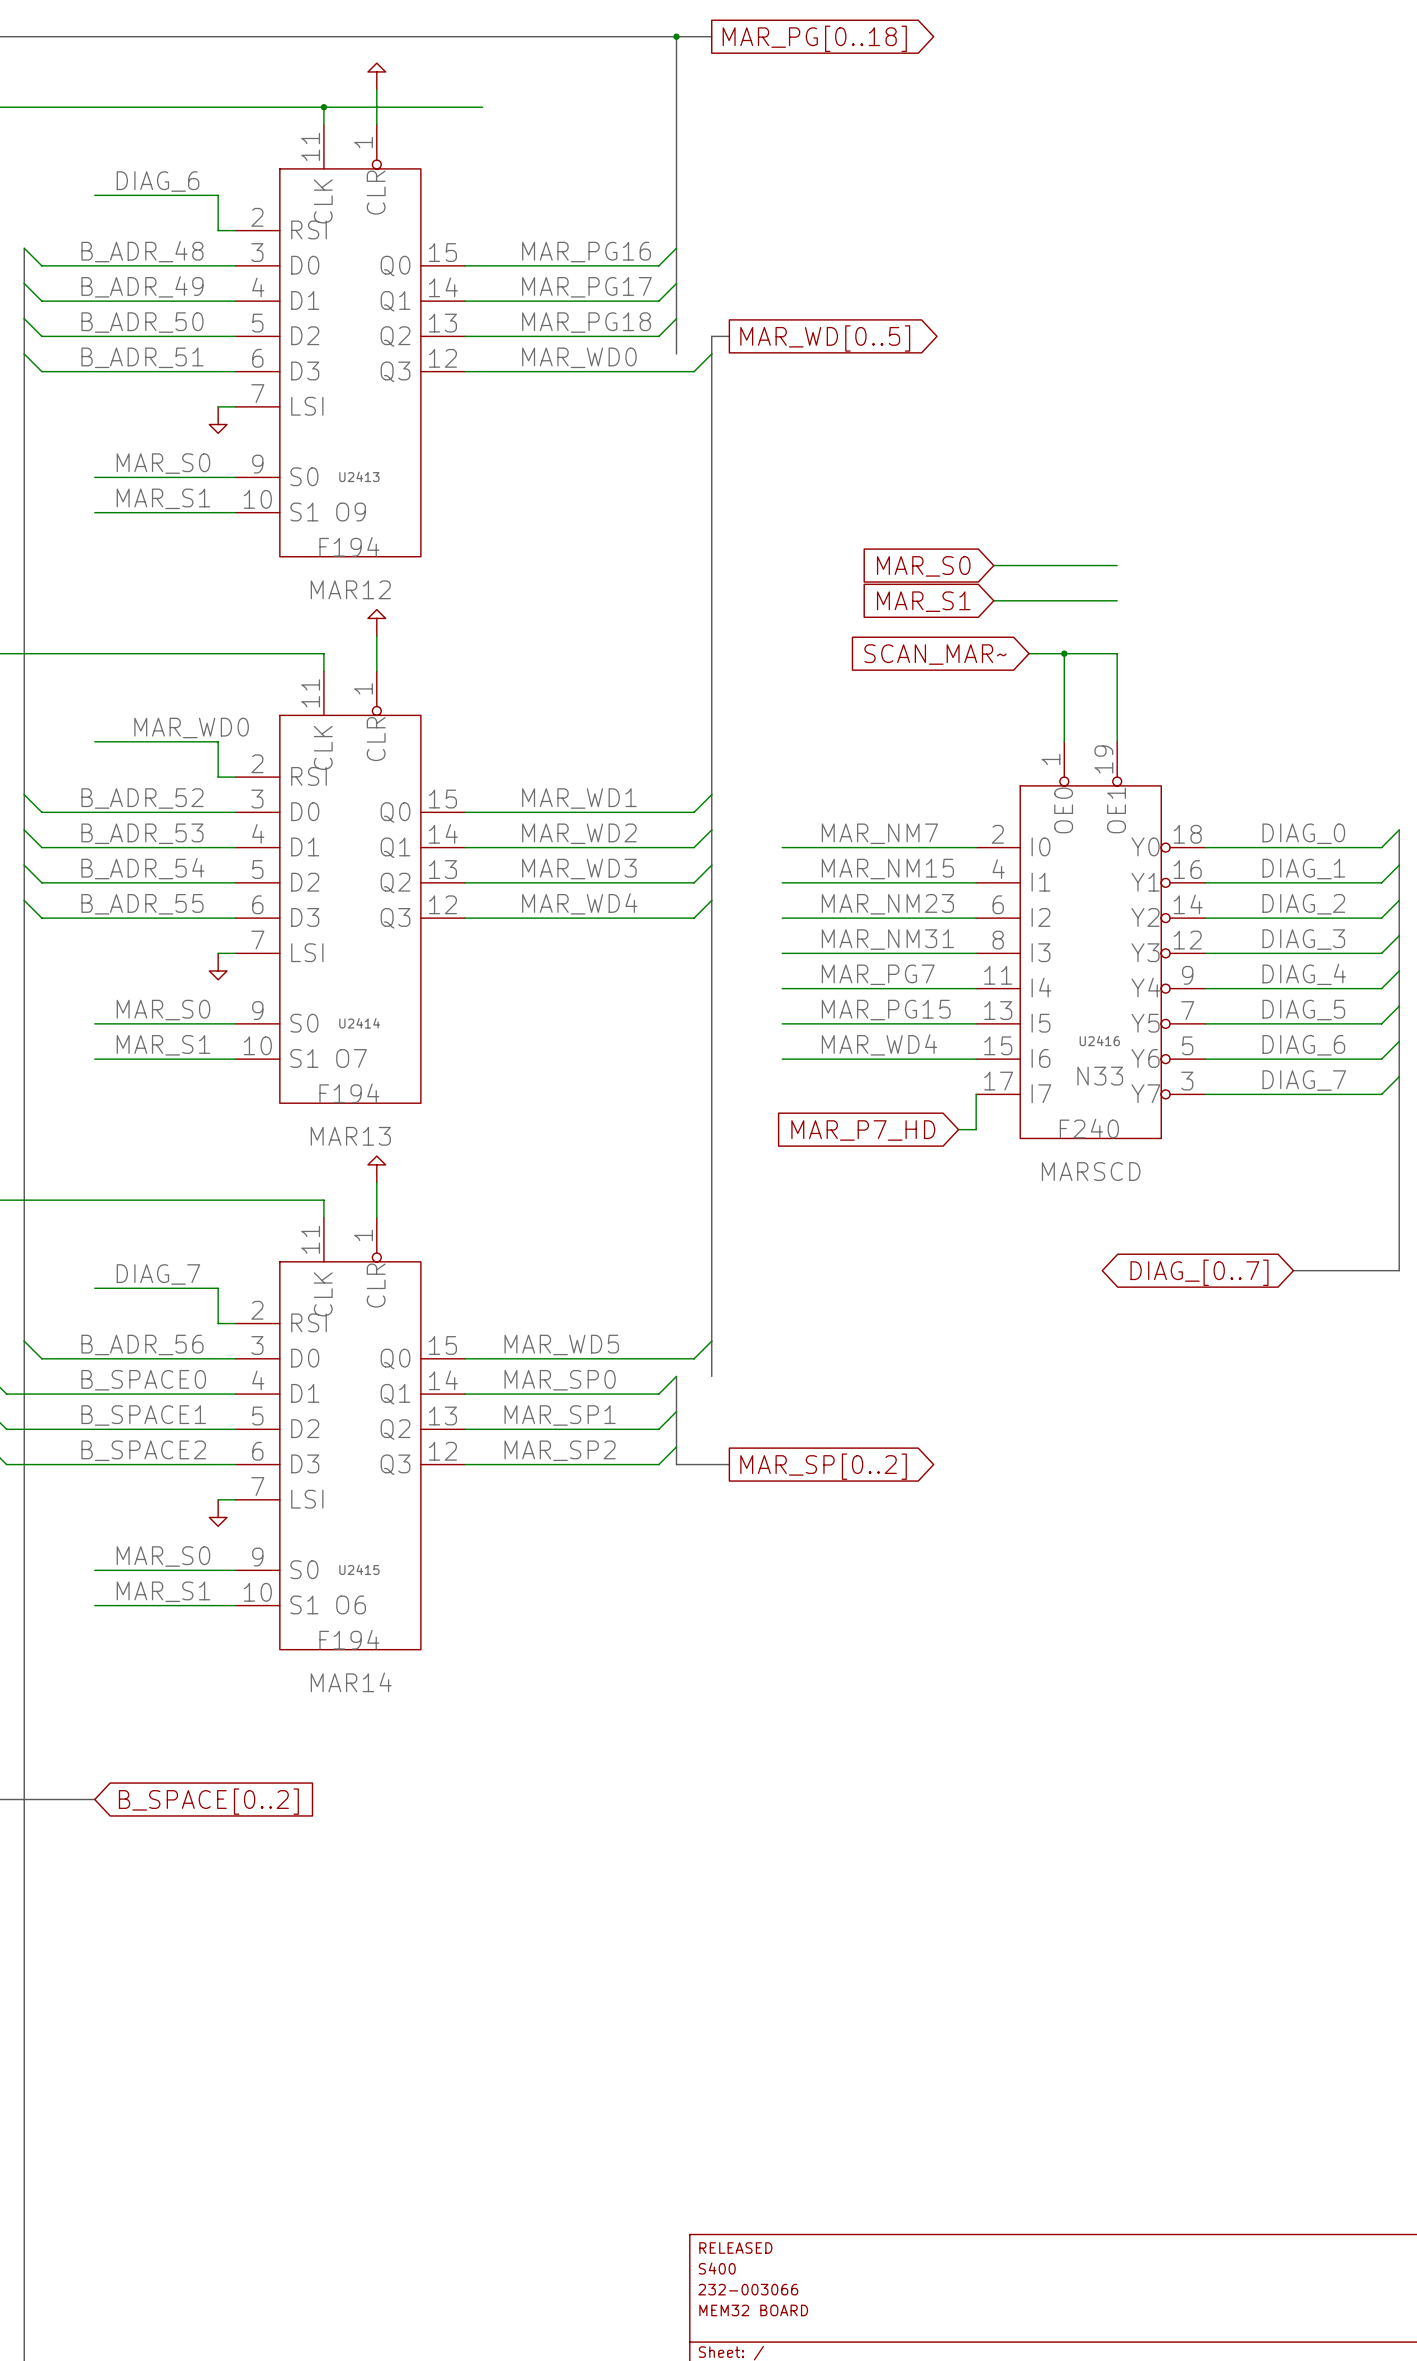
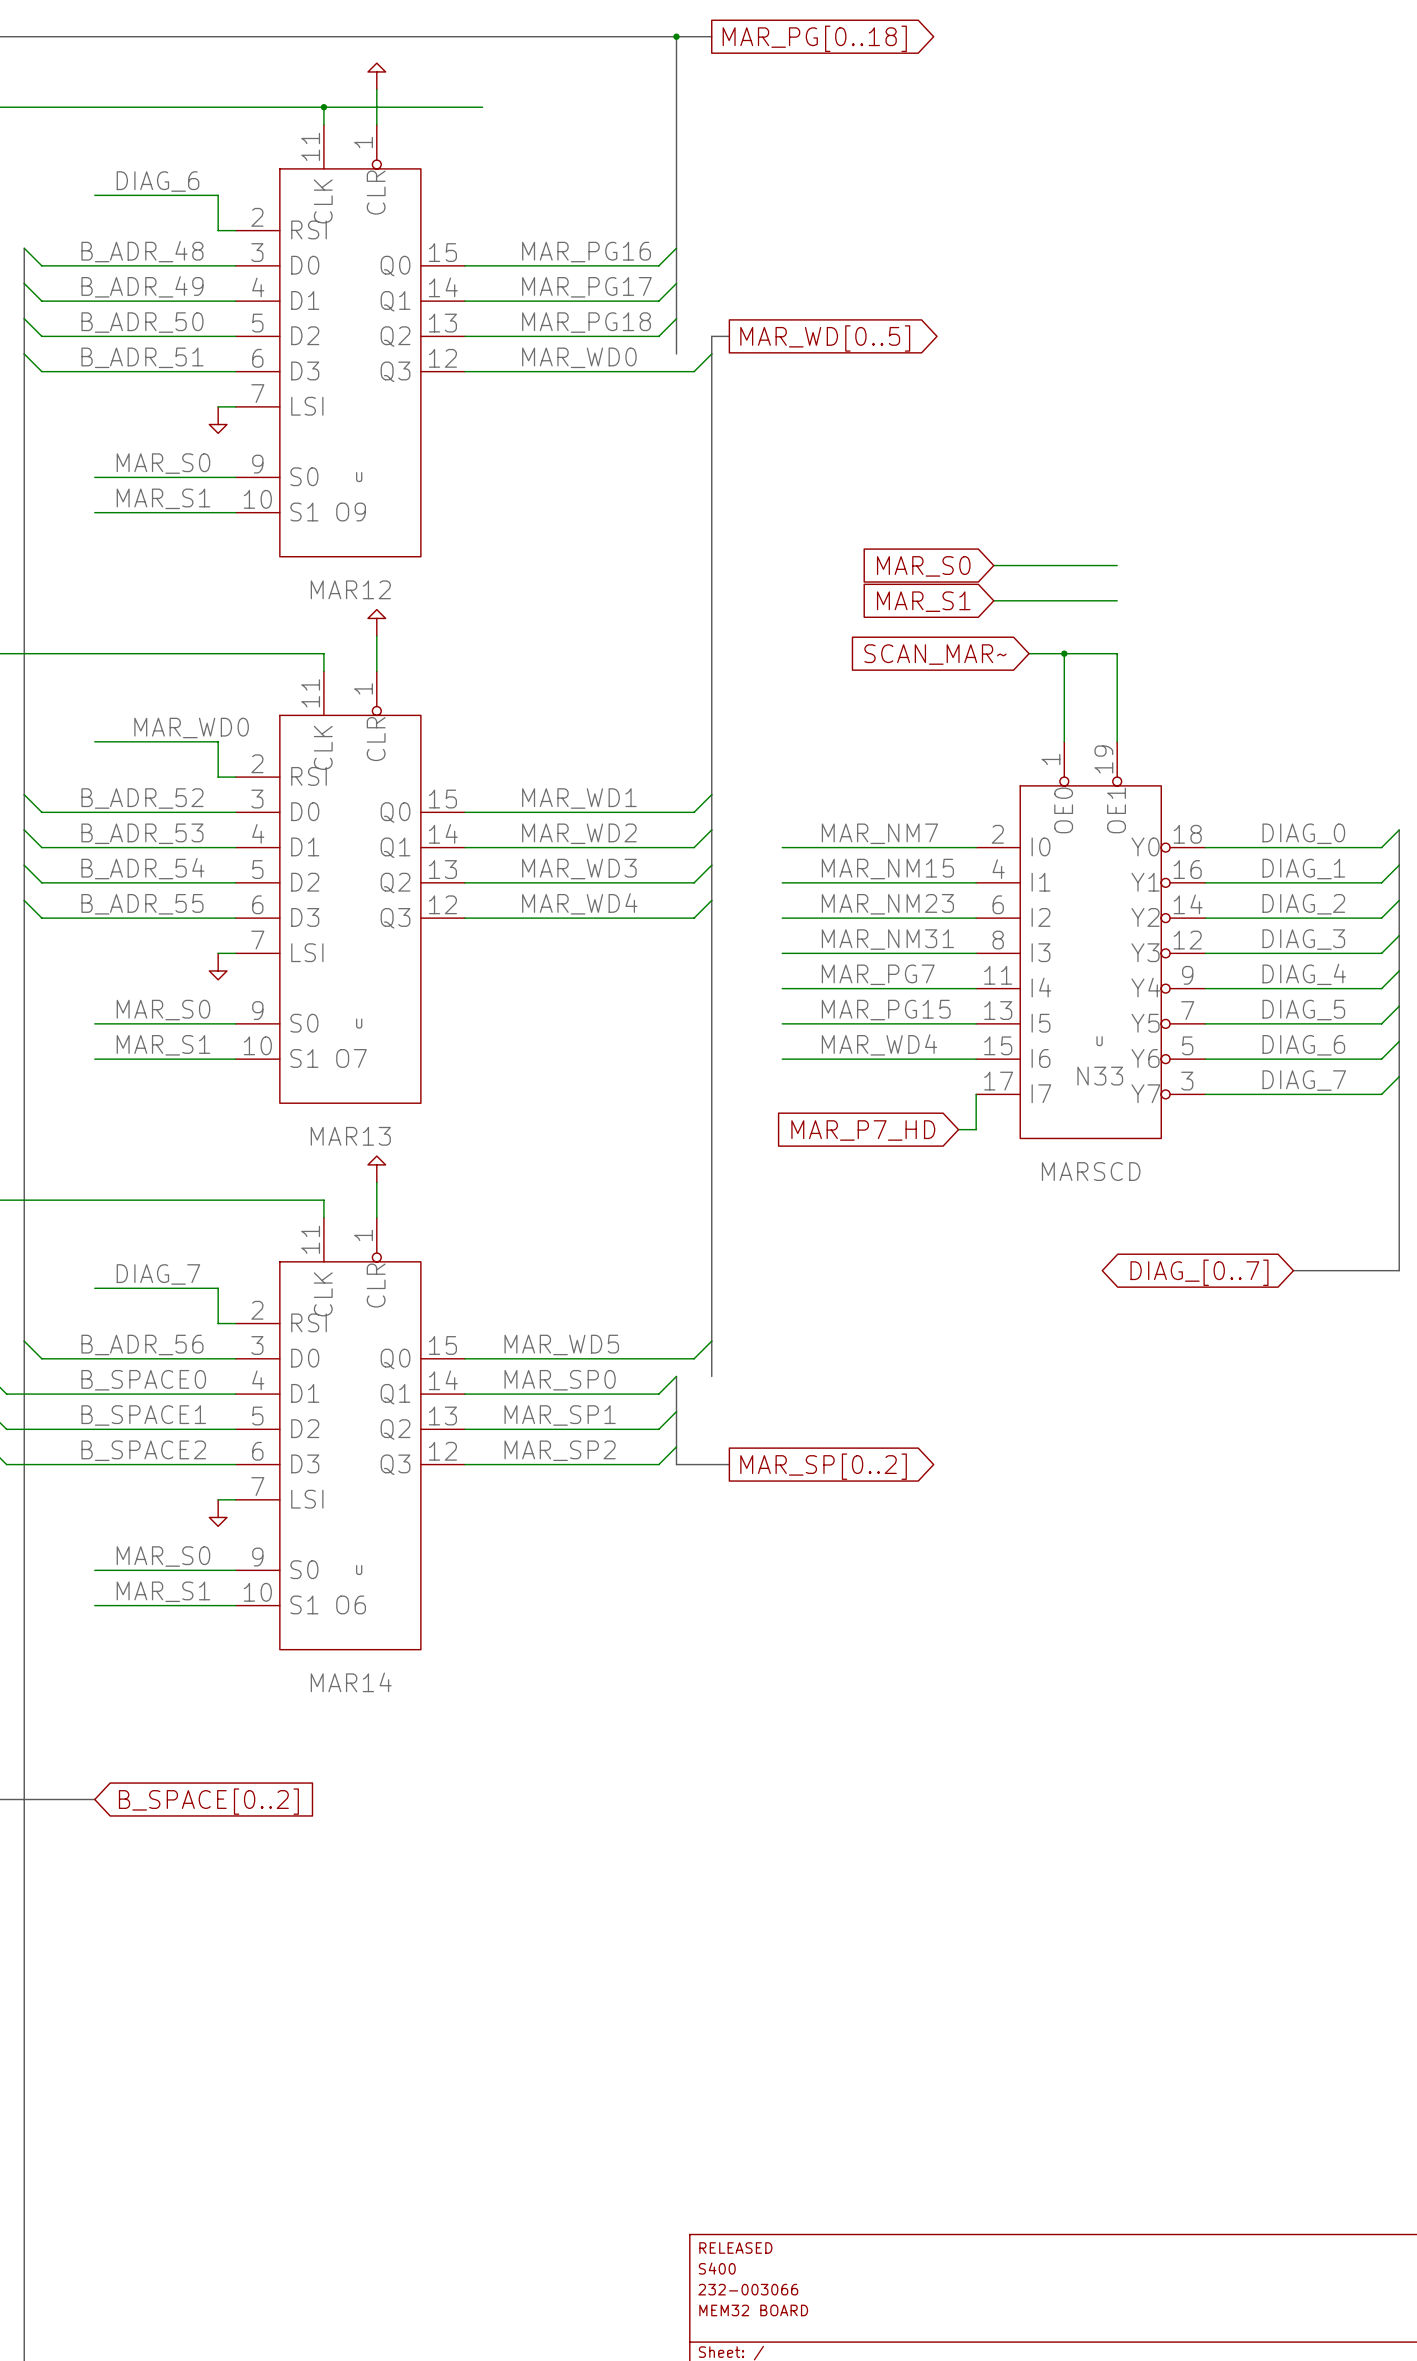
U2413 name: U2413 (359, 476) -> U (359, 477)
U2413 value: F194 (349, 546) -> none
U2414 name: U2414 (359, 1023) -> U (359, 1023)
U2416 name: U2416 (1099, 1040) -> U (1099, 1041)
U2414 value: F194 (349, 1093) -> none
U2416 value: F240 (1089, 1128) -> none
U2415 name: U2415 (359, 1569) -> U (359, 1570)
U2415 value: F194 (349, 1639) -> none

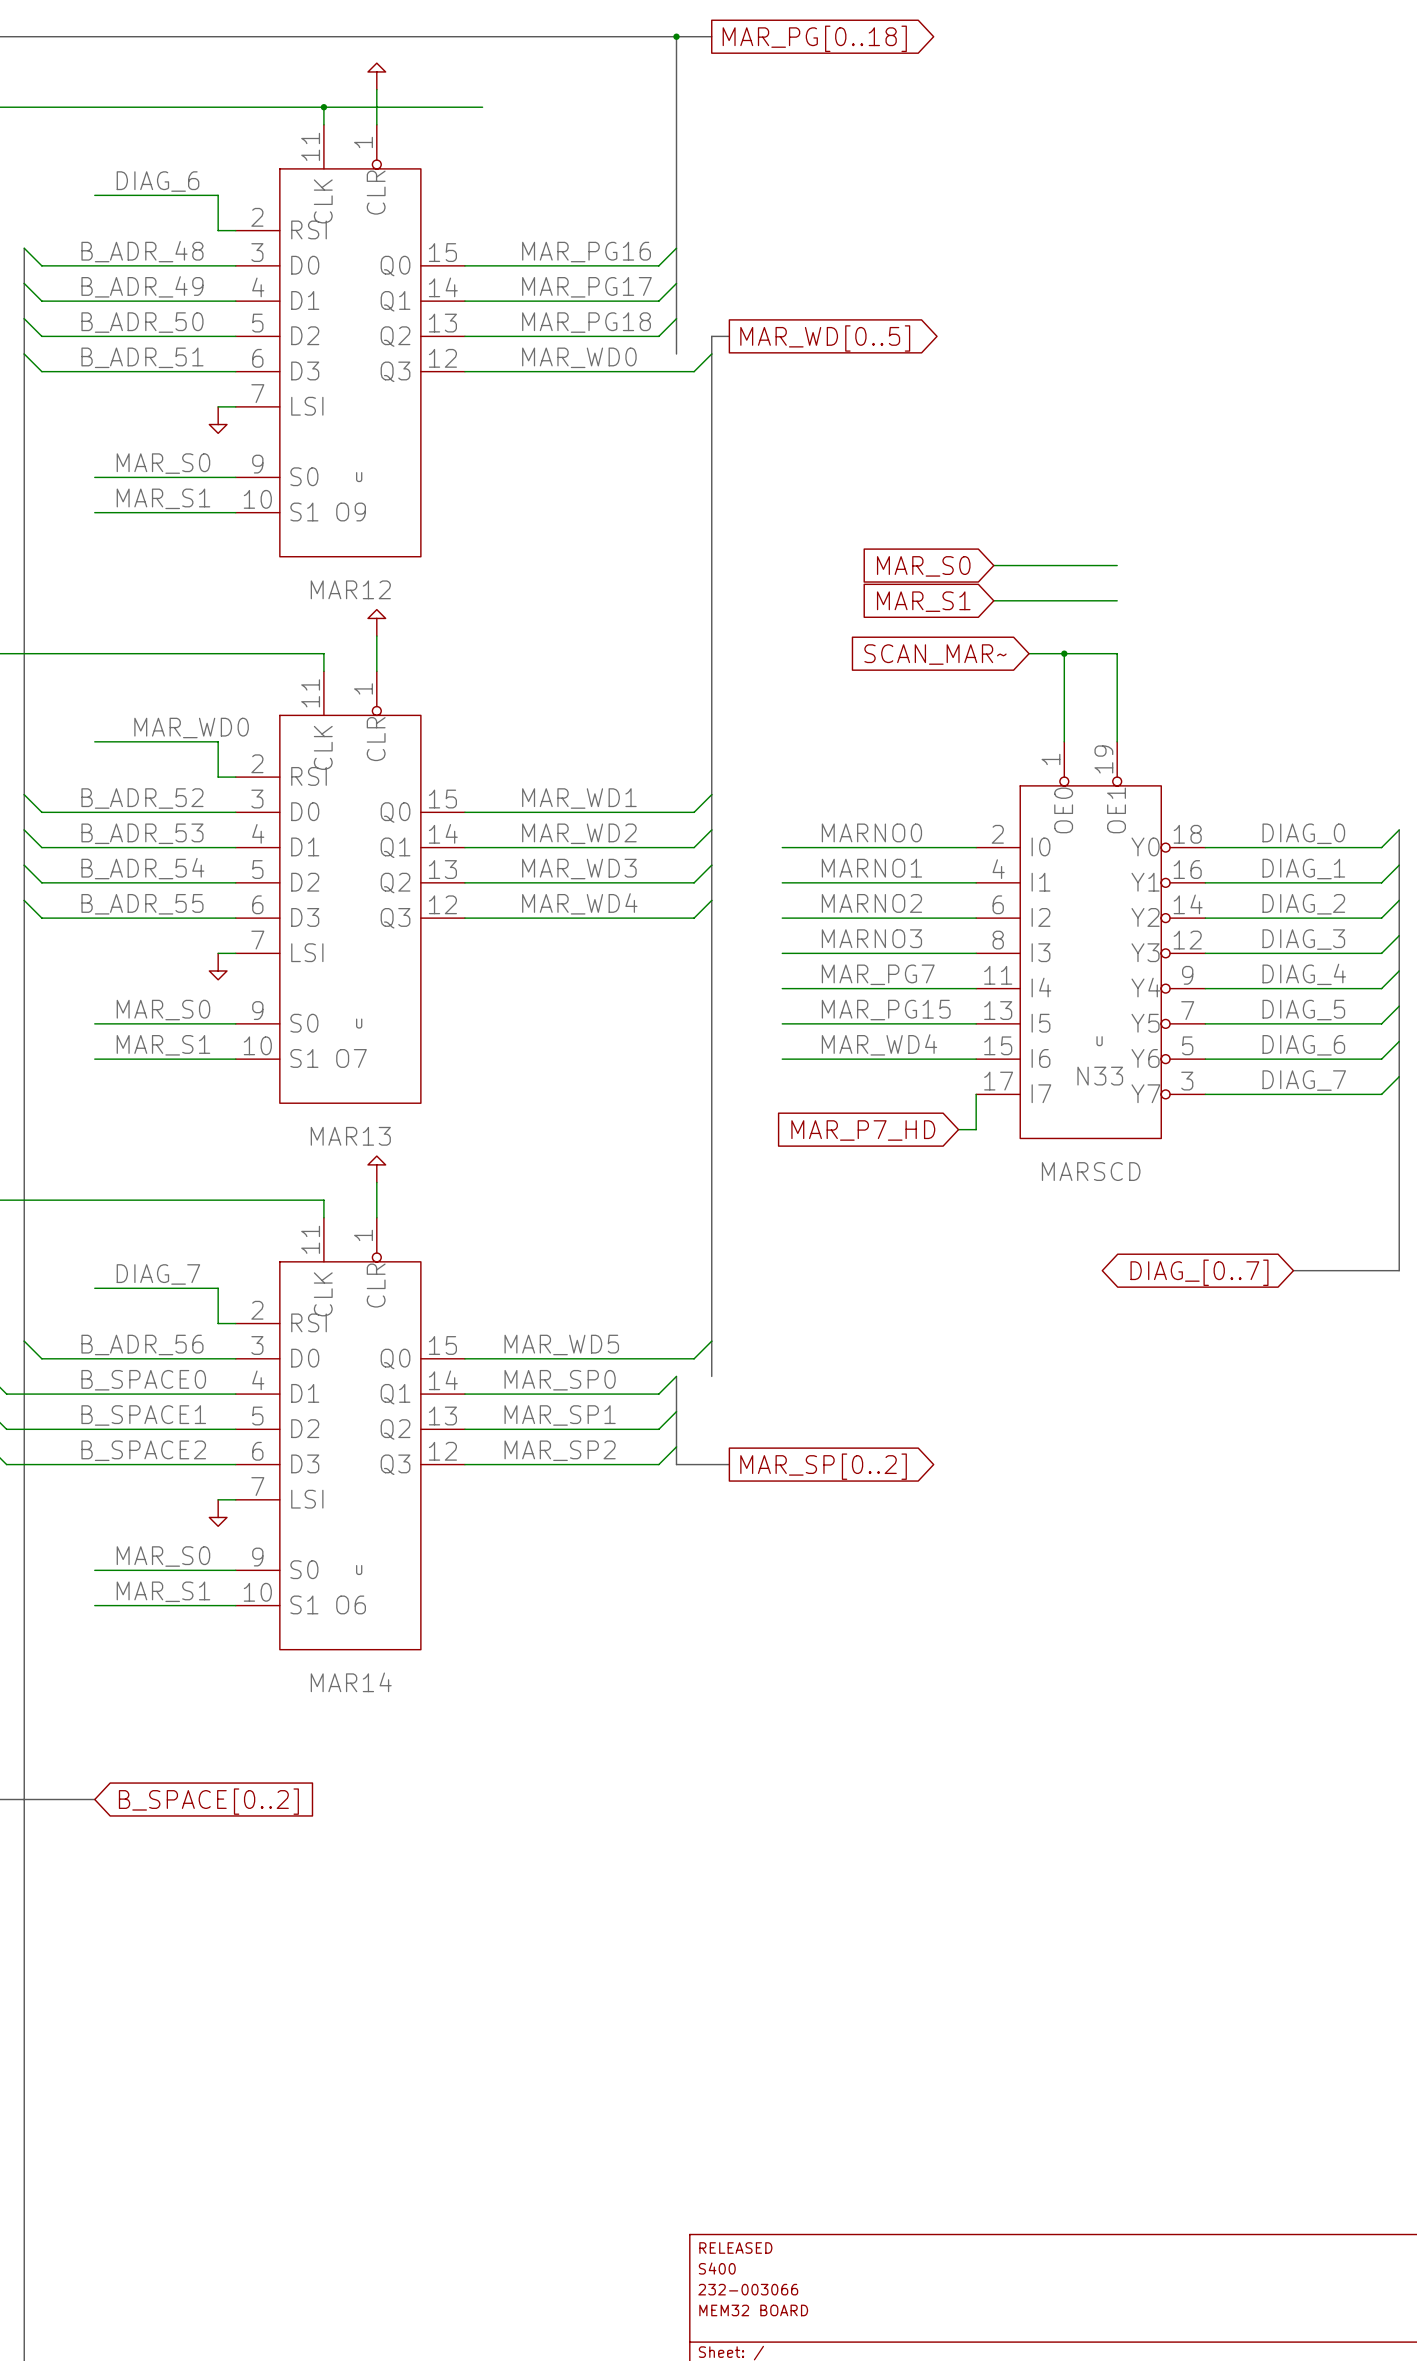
label: MAR_NM7 (879, 833) -> MARNO0 (871, 832)
label: MAR_NM15 (887, 869) -> MARNO1 (871, 868)
label: MAR_NM23 (887, 904) -> MARNO2 (871, 903)
label: MAR_NM31 (887, 939) -> MARNO3 (871, 938)

